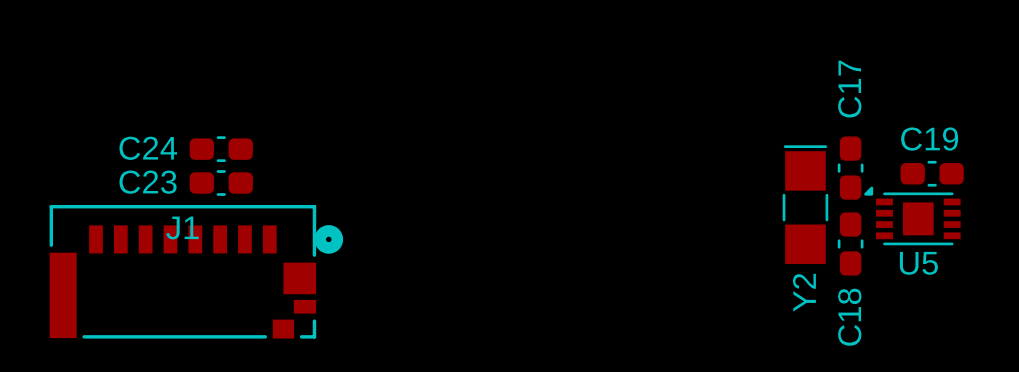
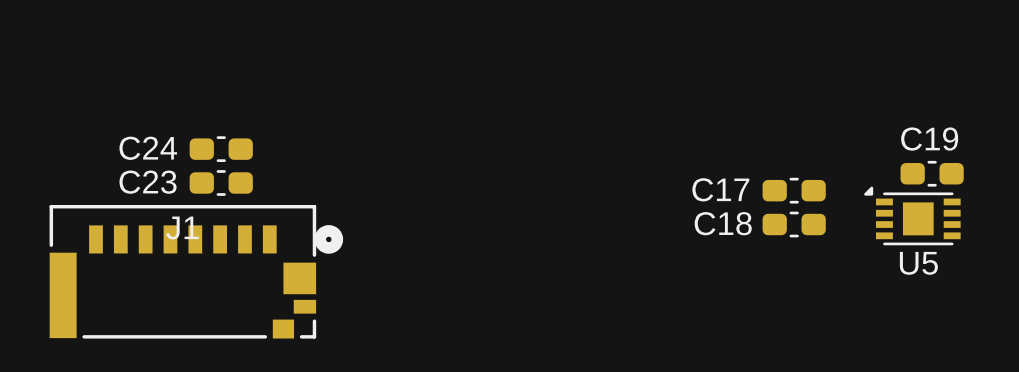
C17 name position: C17 (849, 89) -> C17 (720, 189)
C17 rotation: 0° (850, 168) -> 90° clockwise (794, 190)
C17 position: (850, 168) -> (794, 190)
Y2: (805, 204) -> none
C18 rotation: 0° (850, 243) -> 90° clockwise (794, 224)
C18 position: (850, 243) -> (794, 224)

